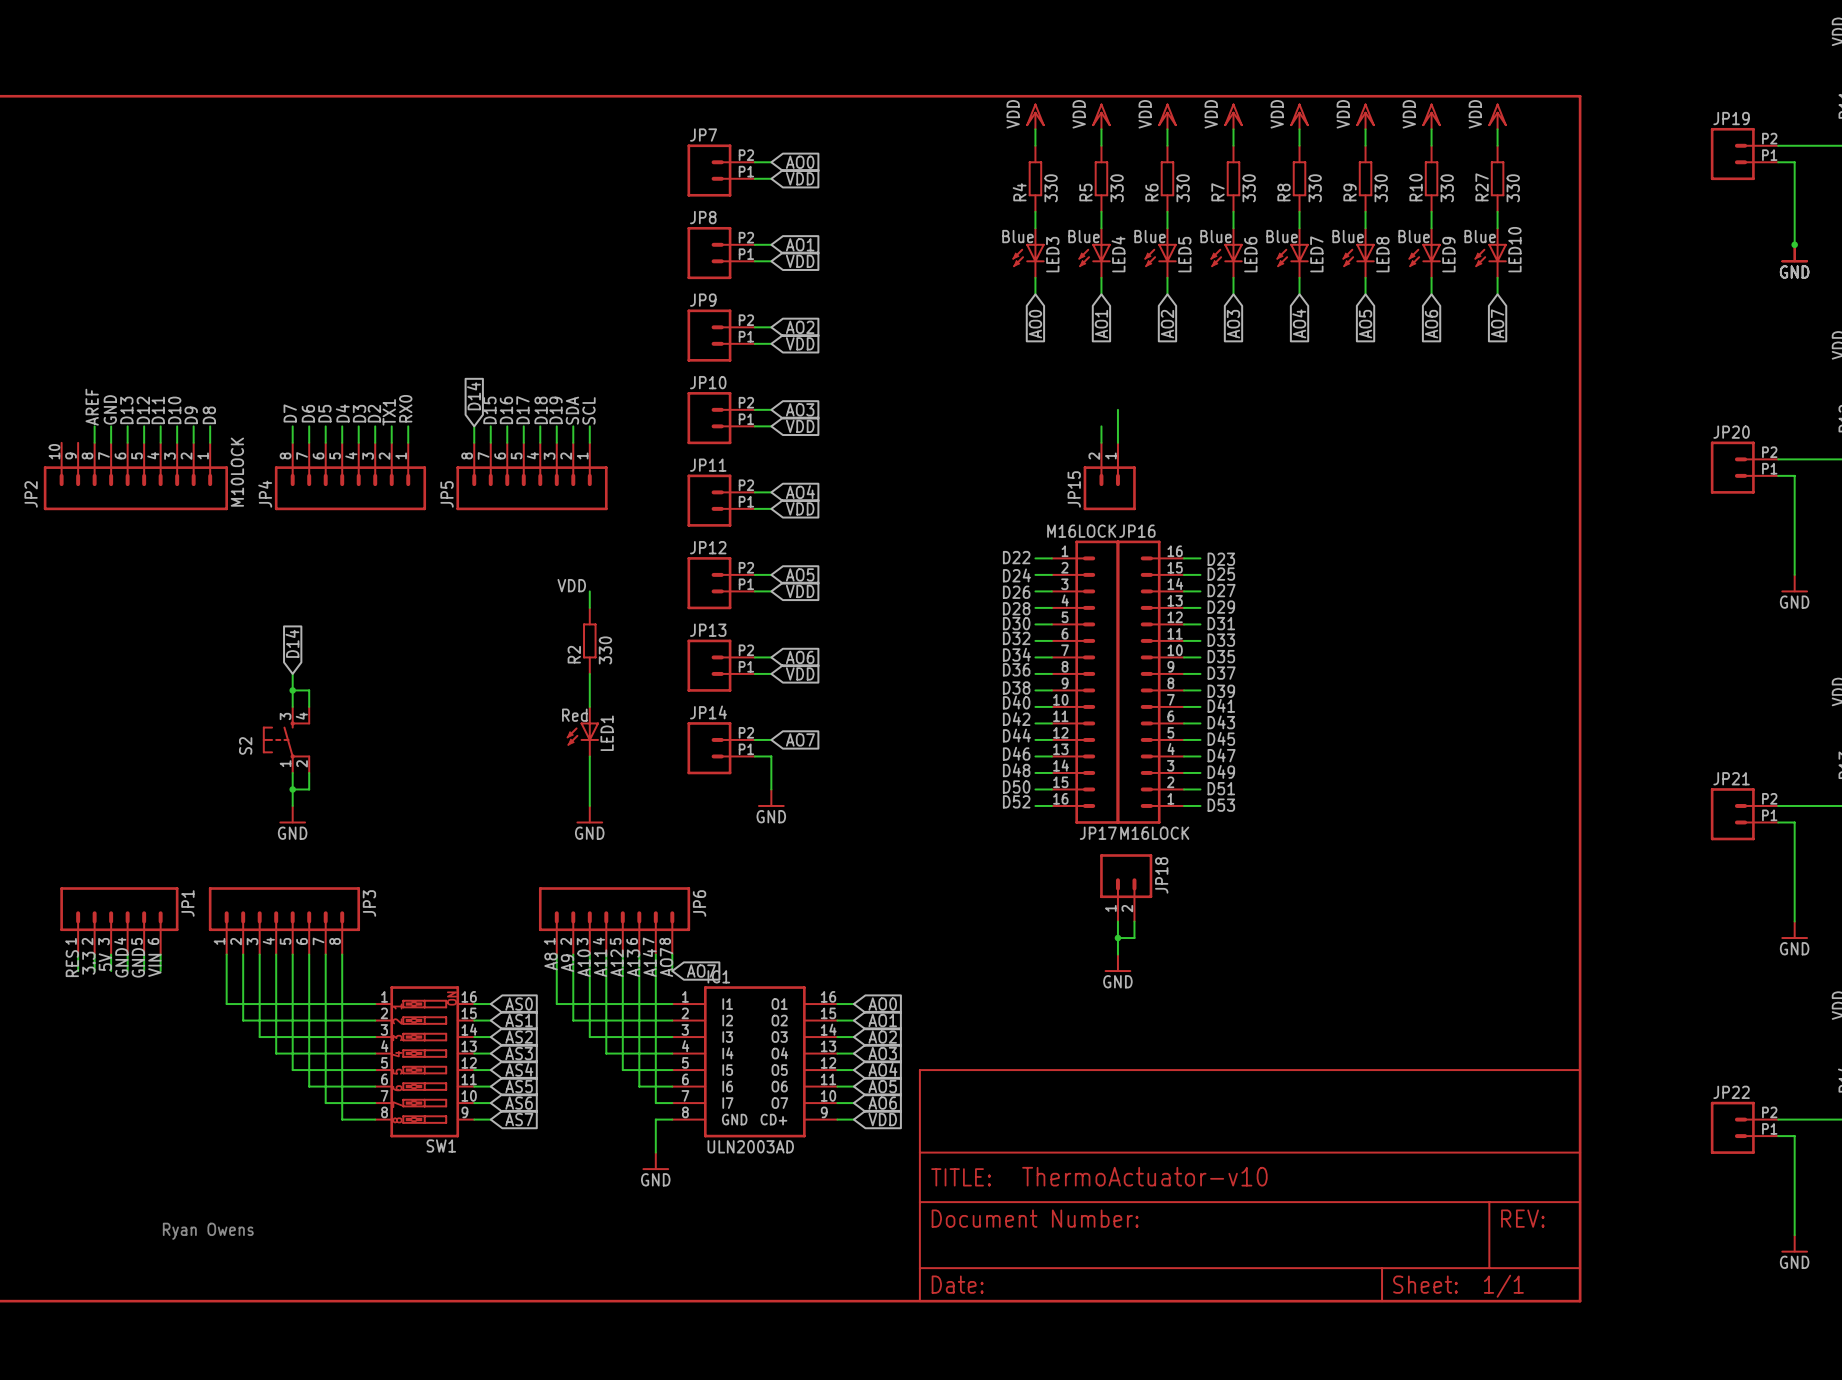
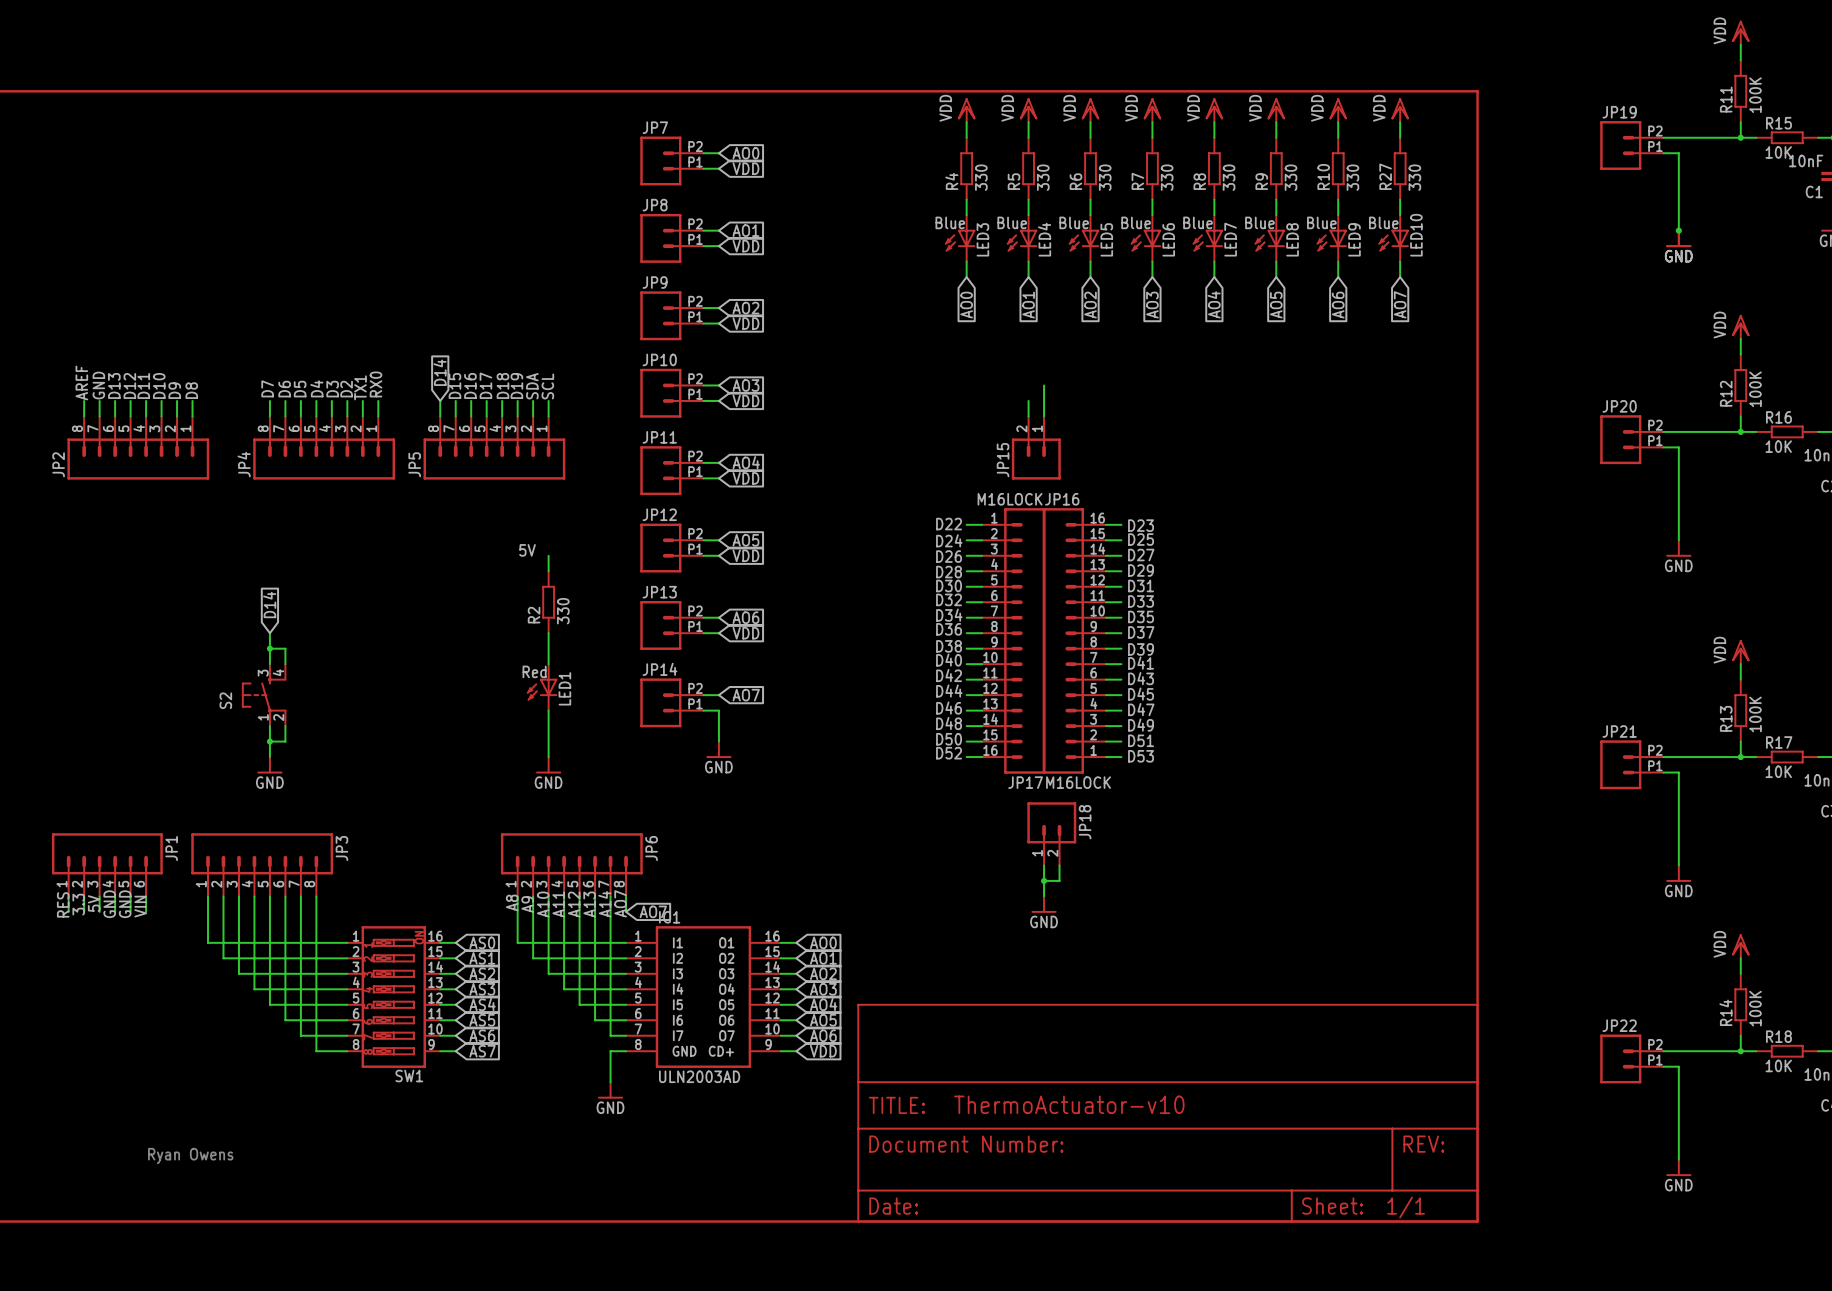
JP2 symbol: [43, 442, 228, 511] -> [67, 416, 210, 480]
JP2 value: M10LOCK (237, 472) -> none
JP2 name position: JP2 (31, 494) -> JP2 (58, 464)
label: VDD (571, 585) -> 5V (527, 550)

